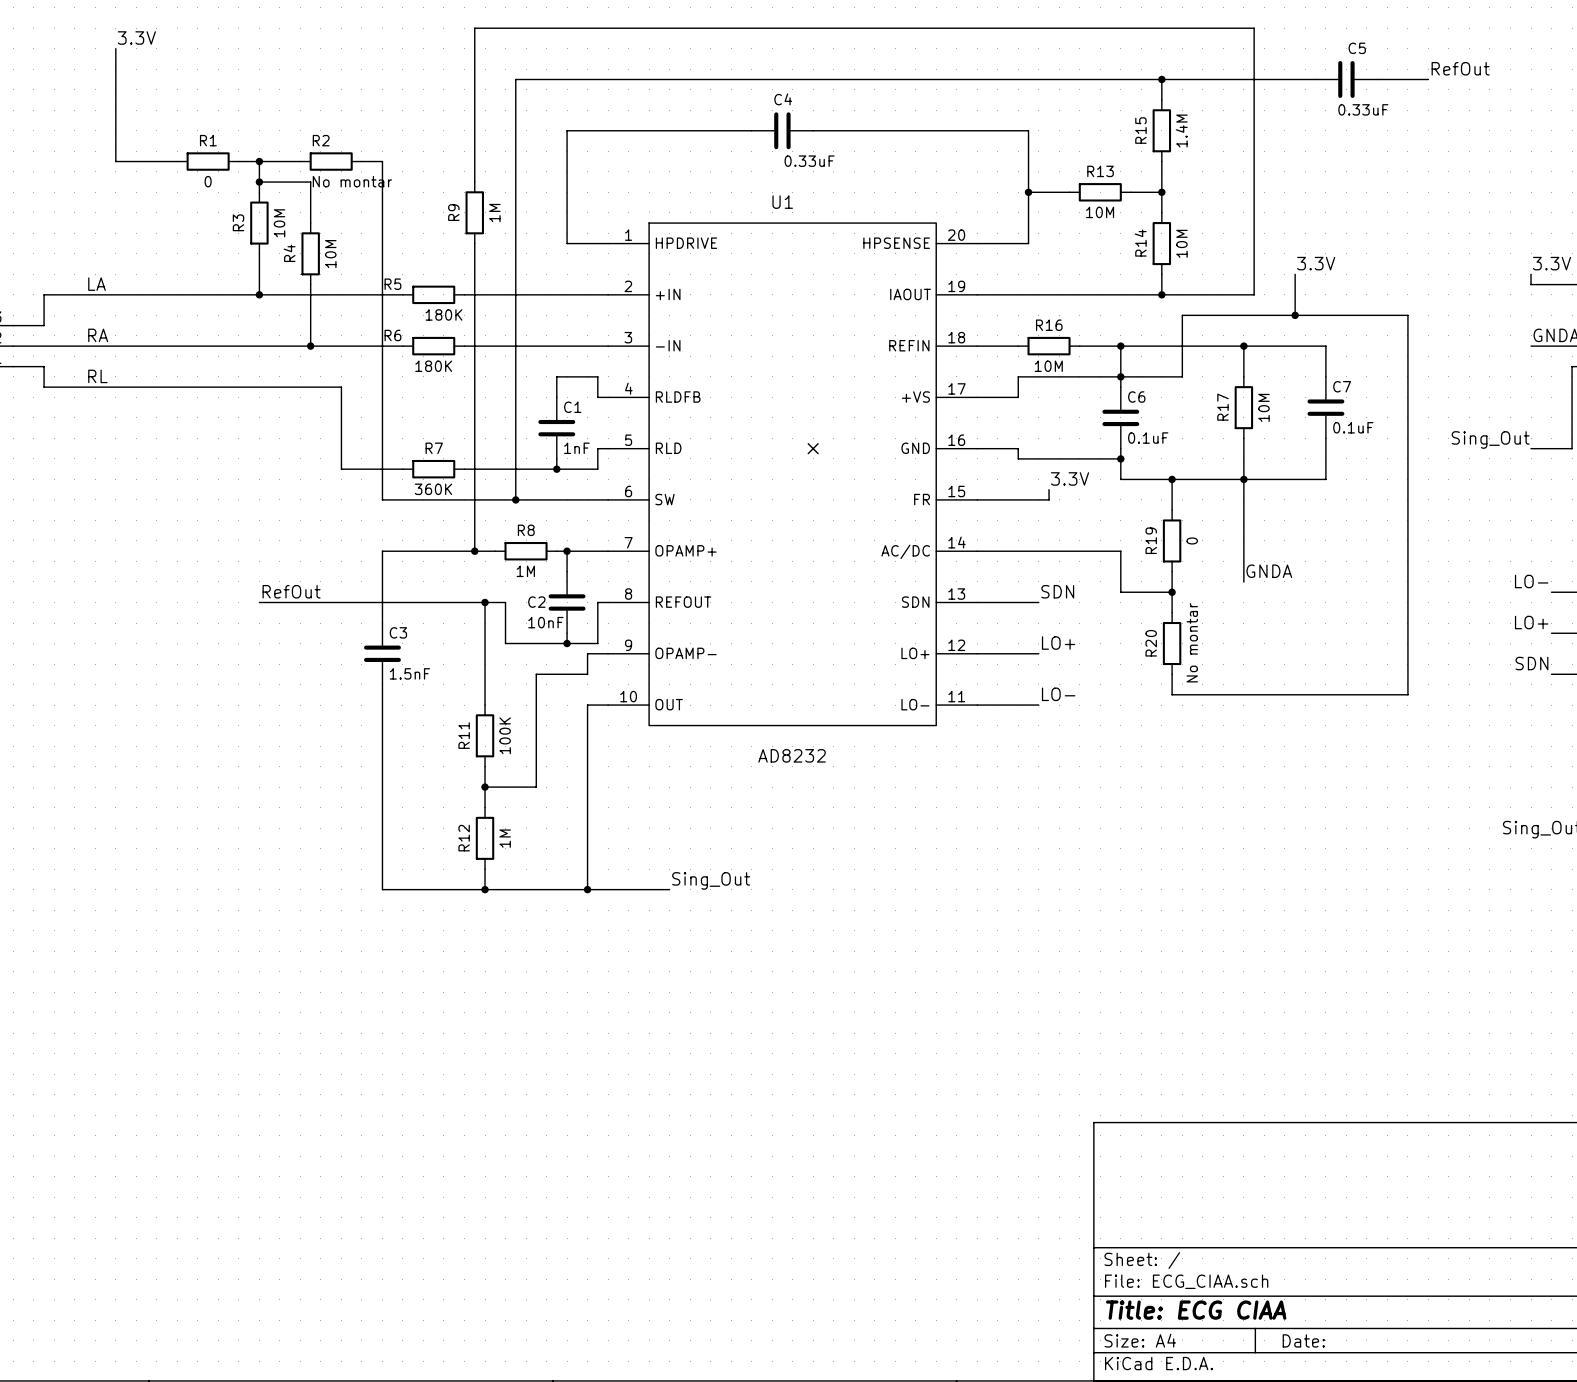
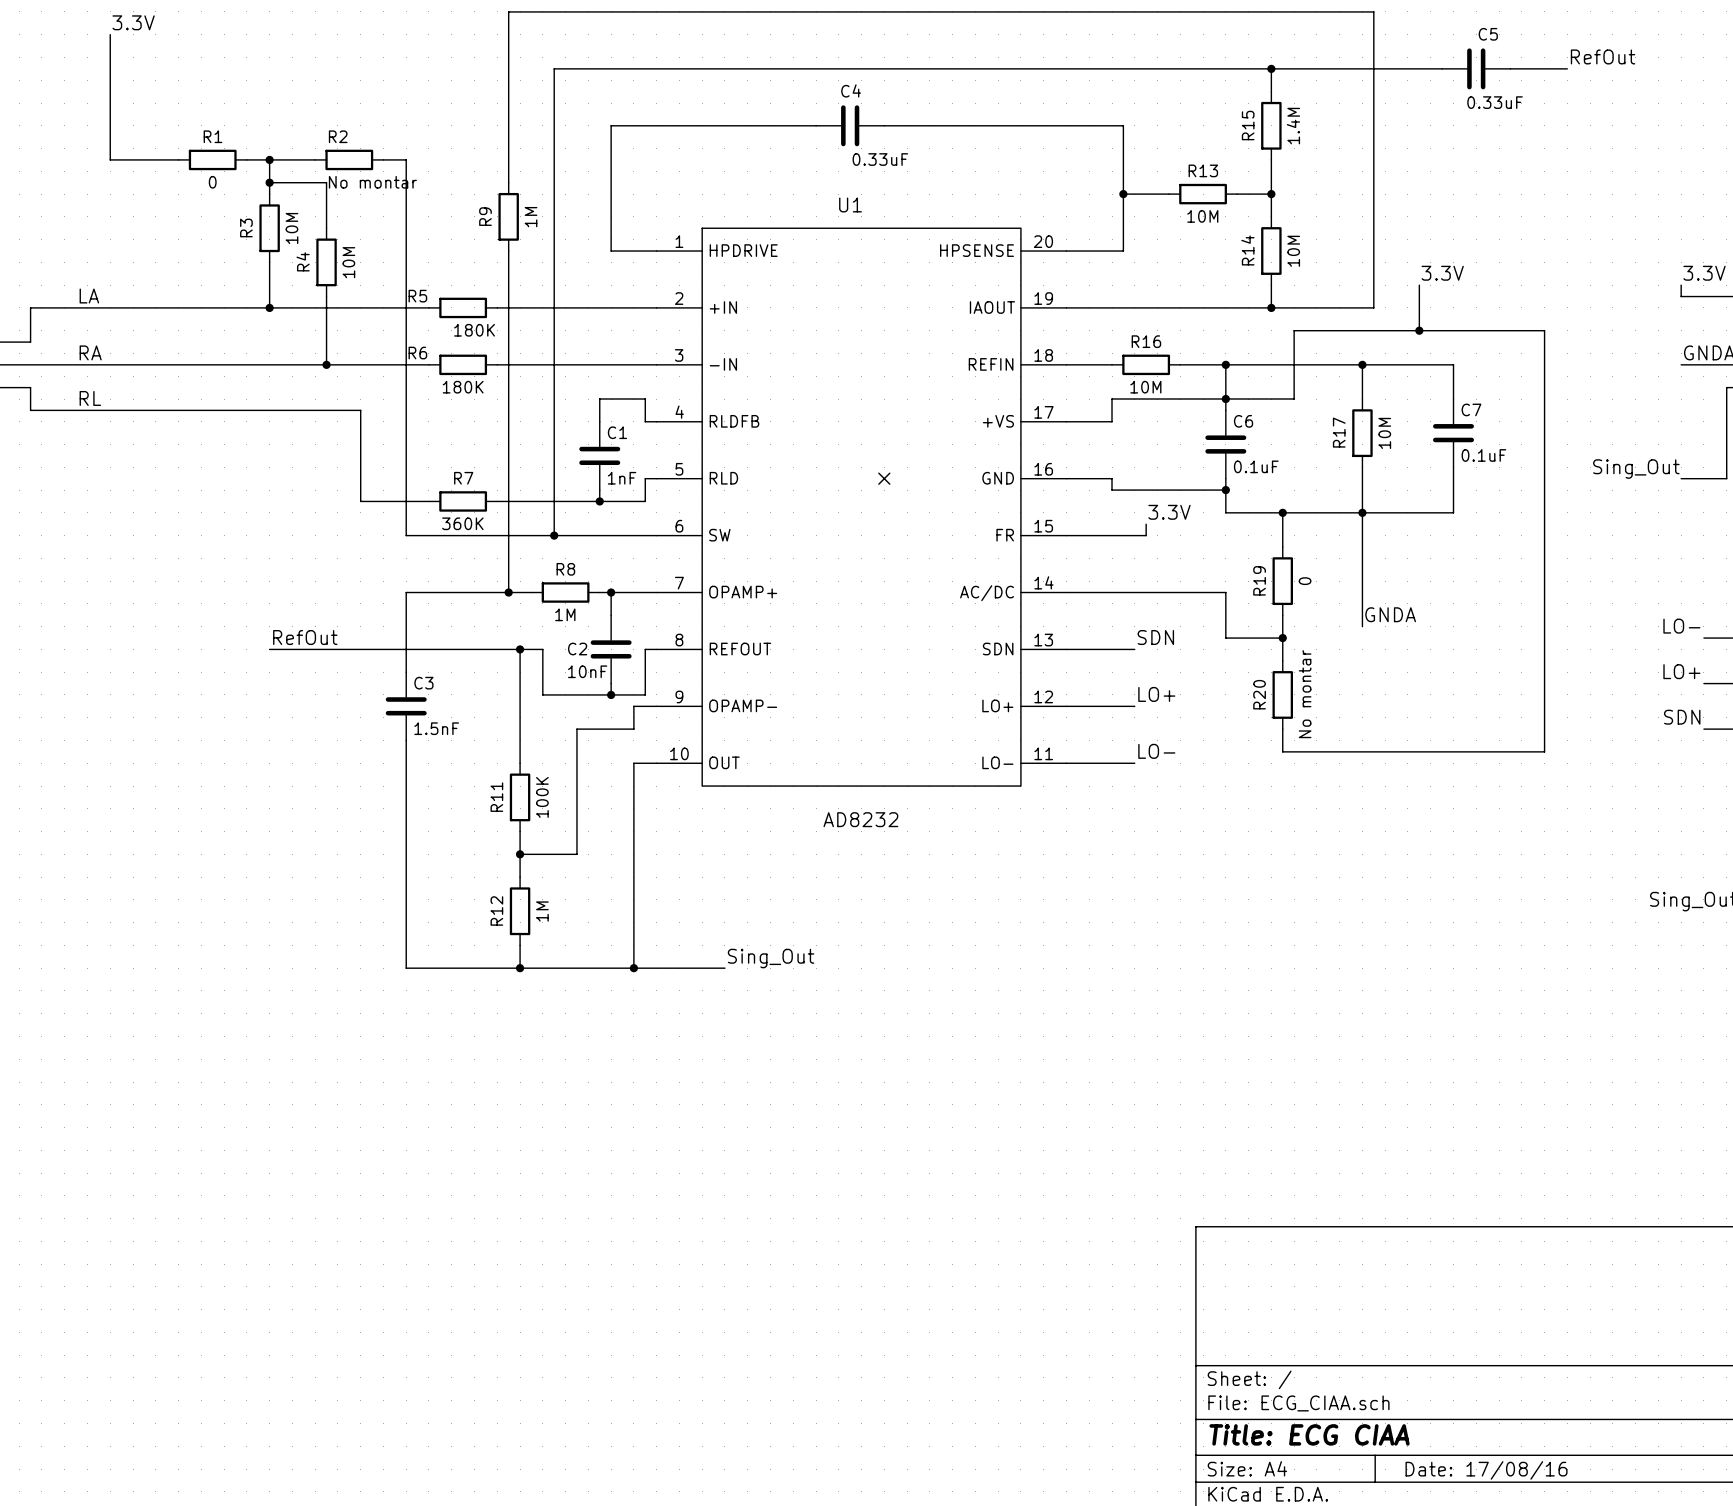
title block: Date: (1303, 1340) -> Date: 17/08/16 (1486, 1470)

